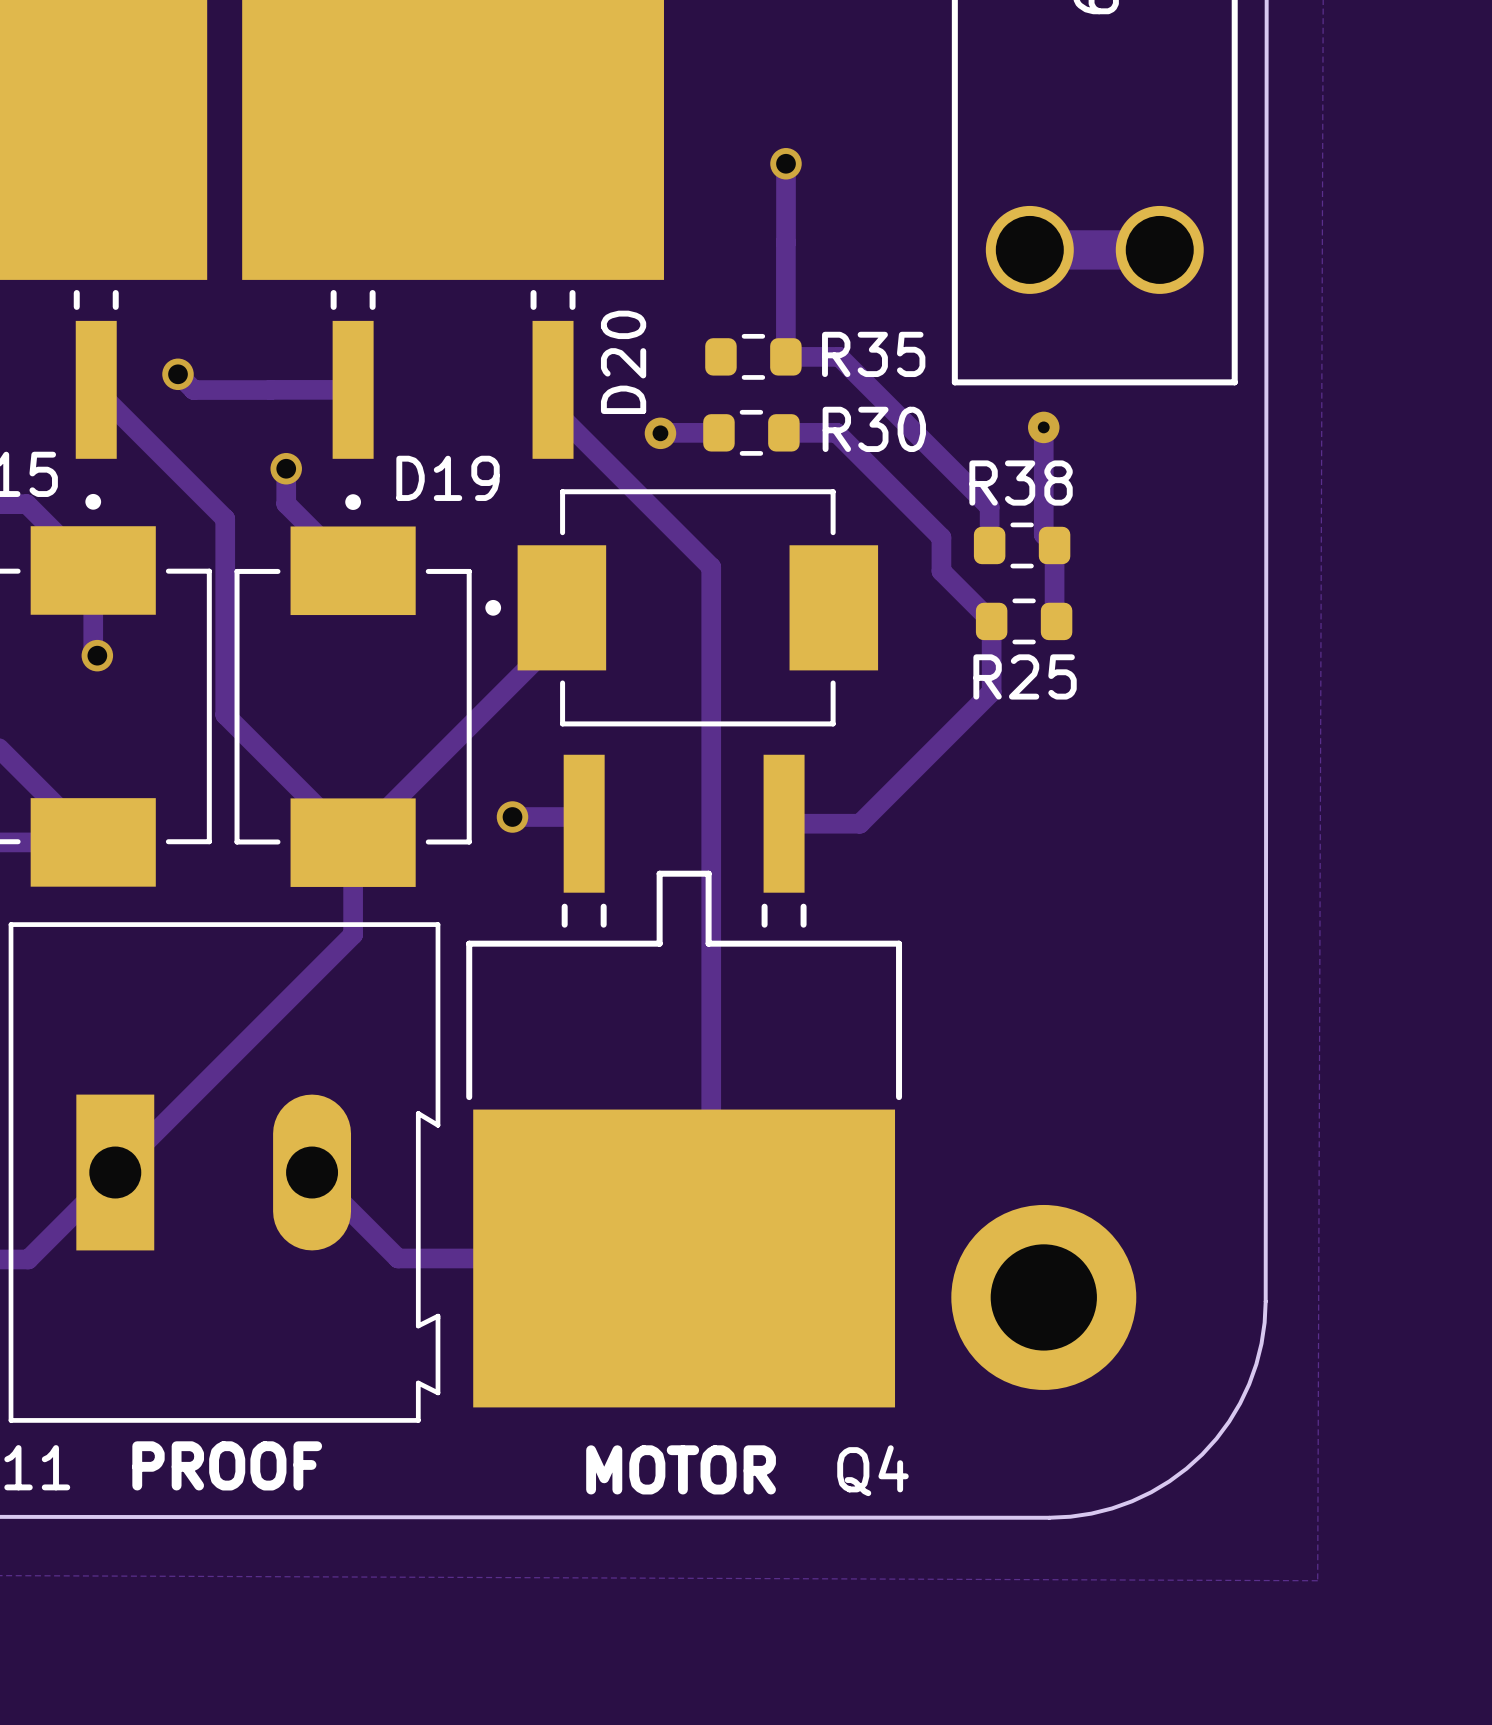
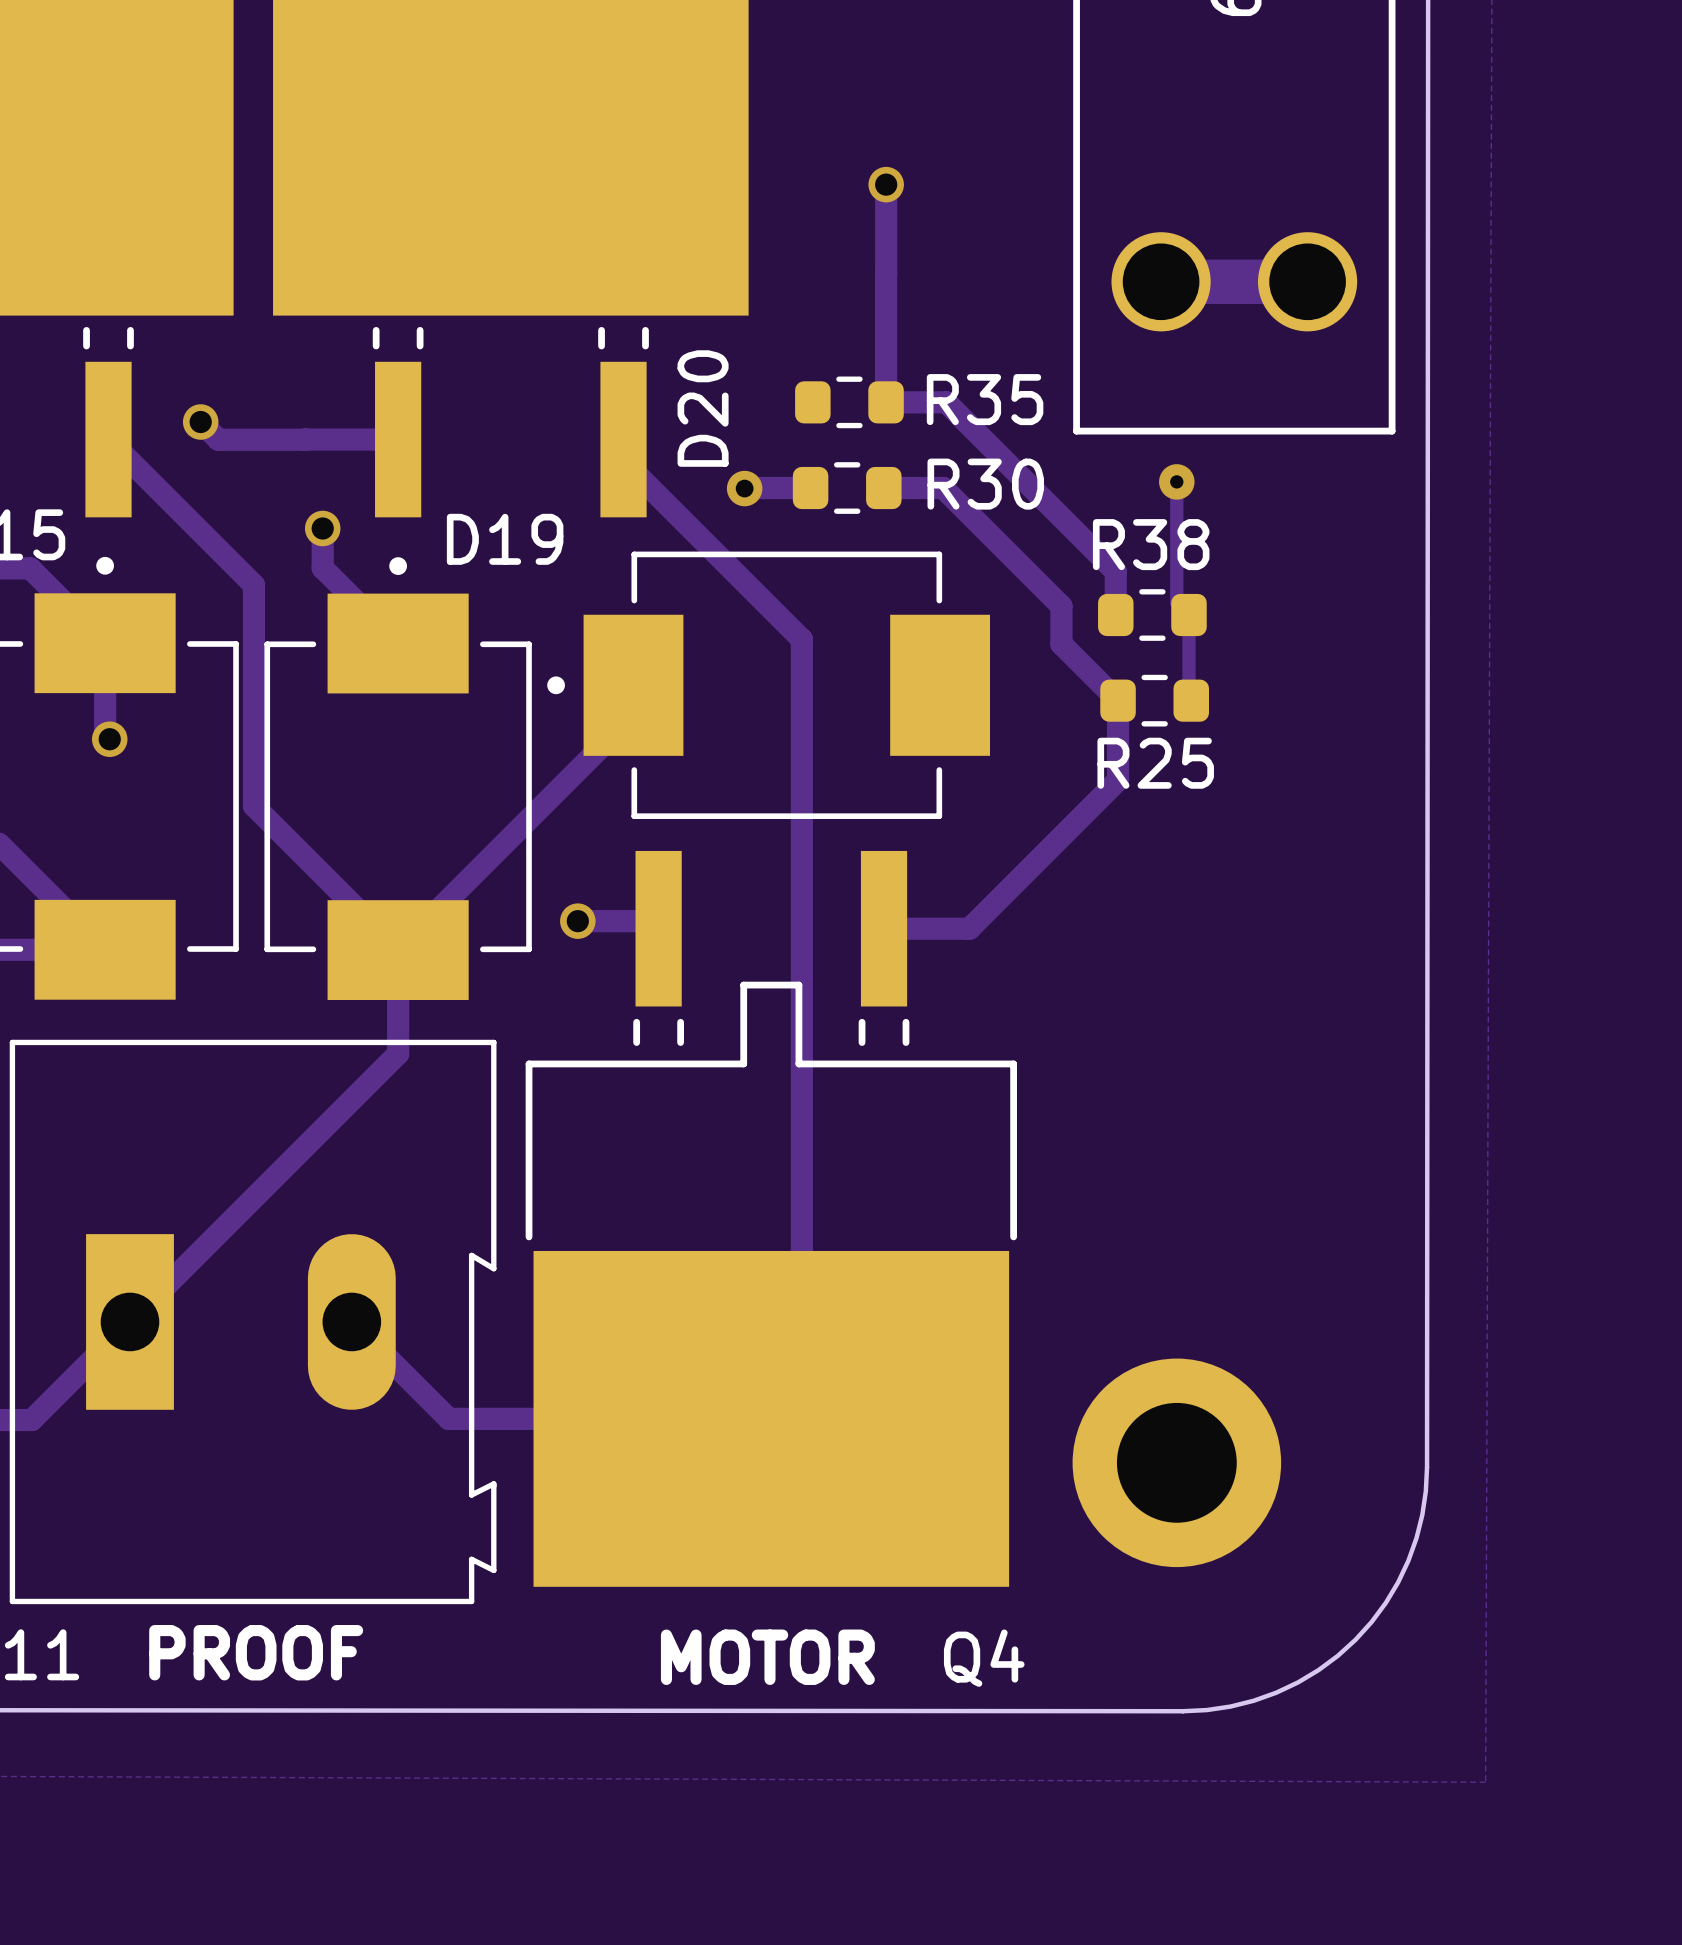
track width: thick (1043, 427) (1043, 534) (1054, 545) (1054, 619) (1056, 621) -> thin (1176, 481) (1176, 602) (1188, 615) (1188, 698) (1191, 700)

